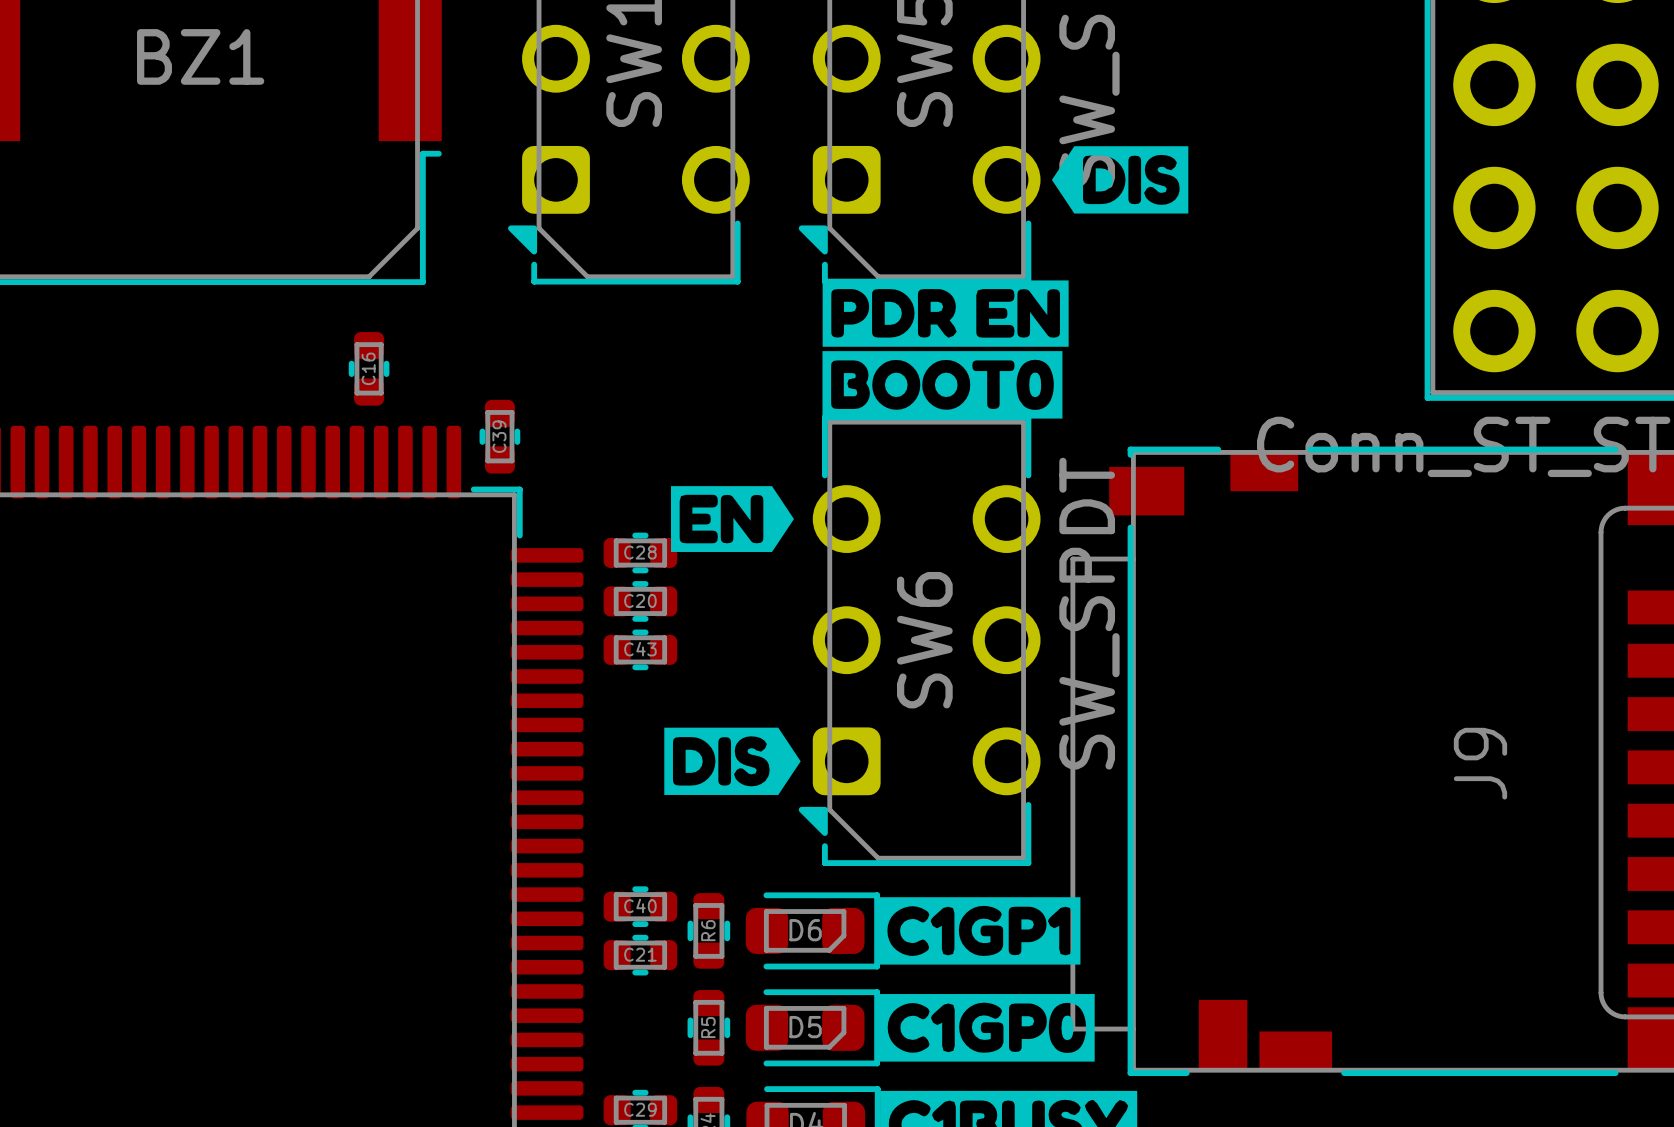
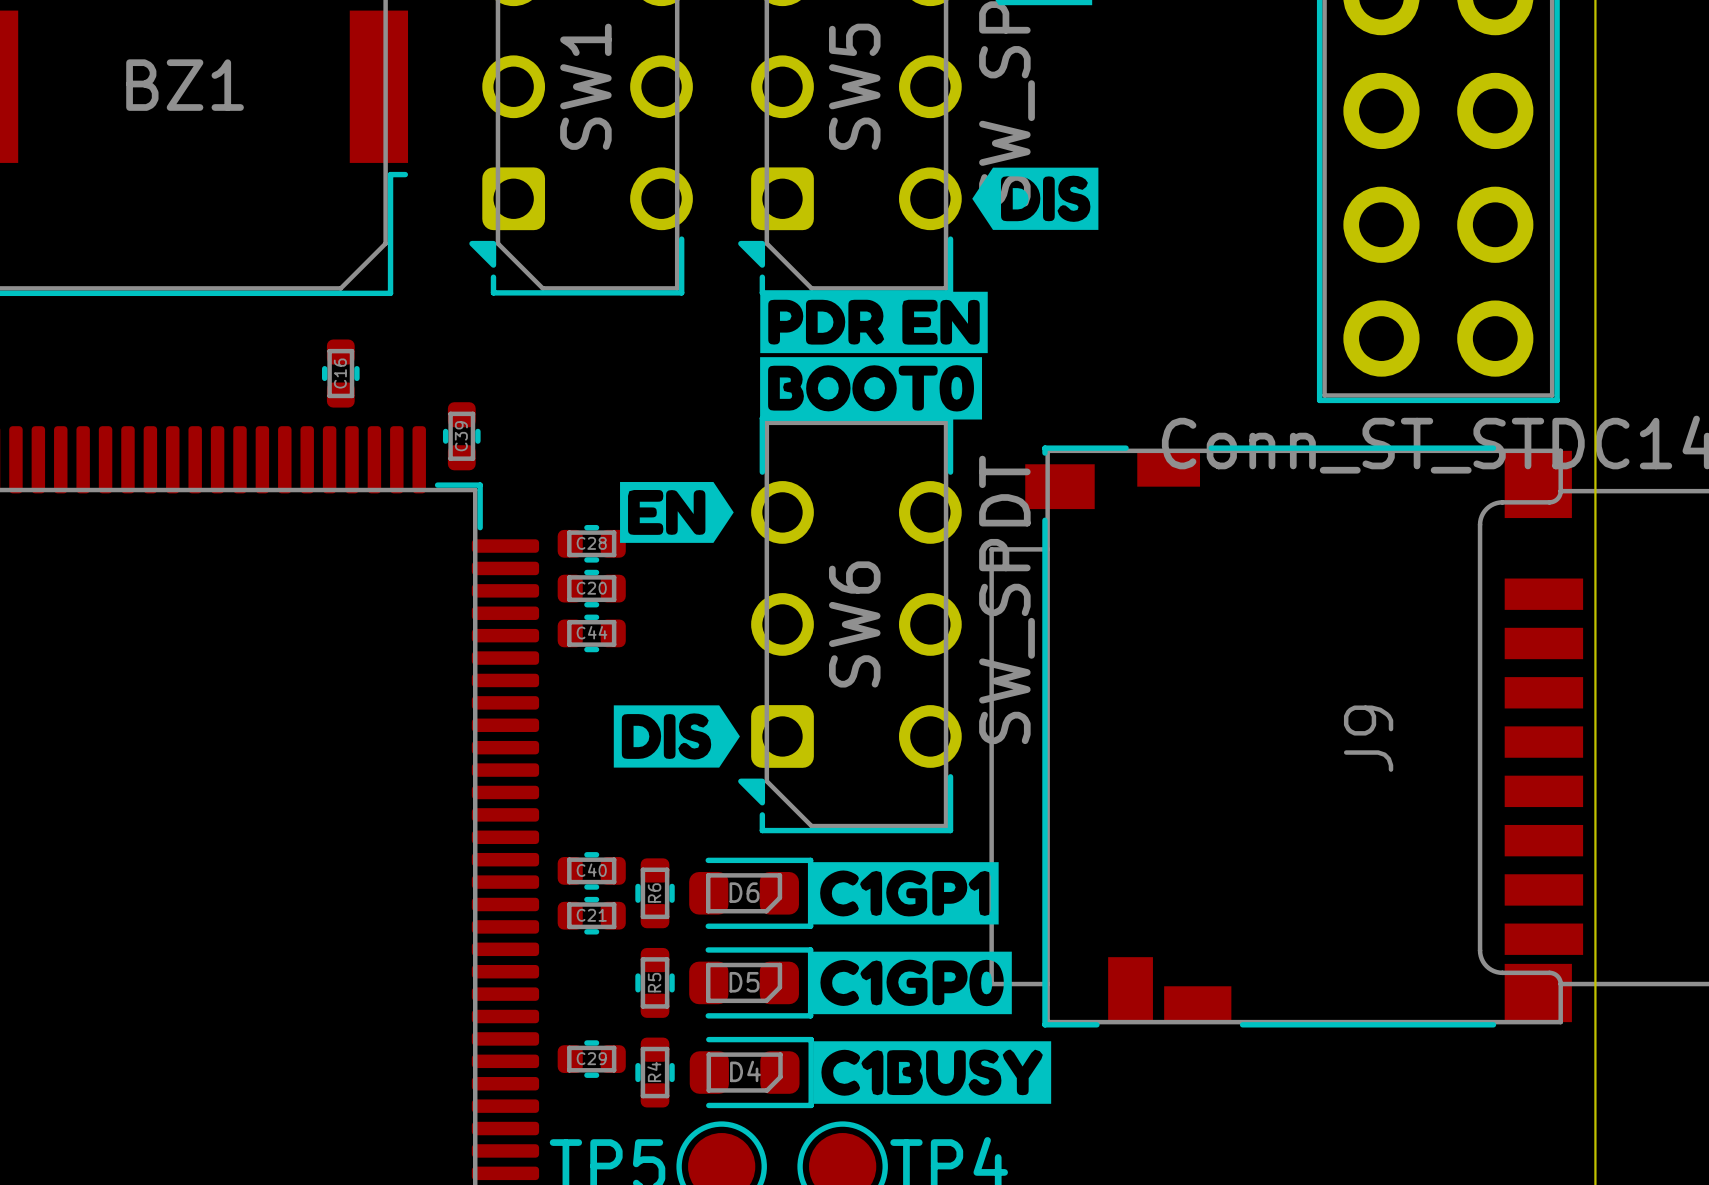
C43 name: C43 (640, 649) -> C44 (592, 632)

